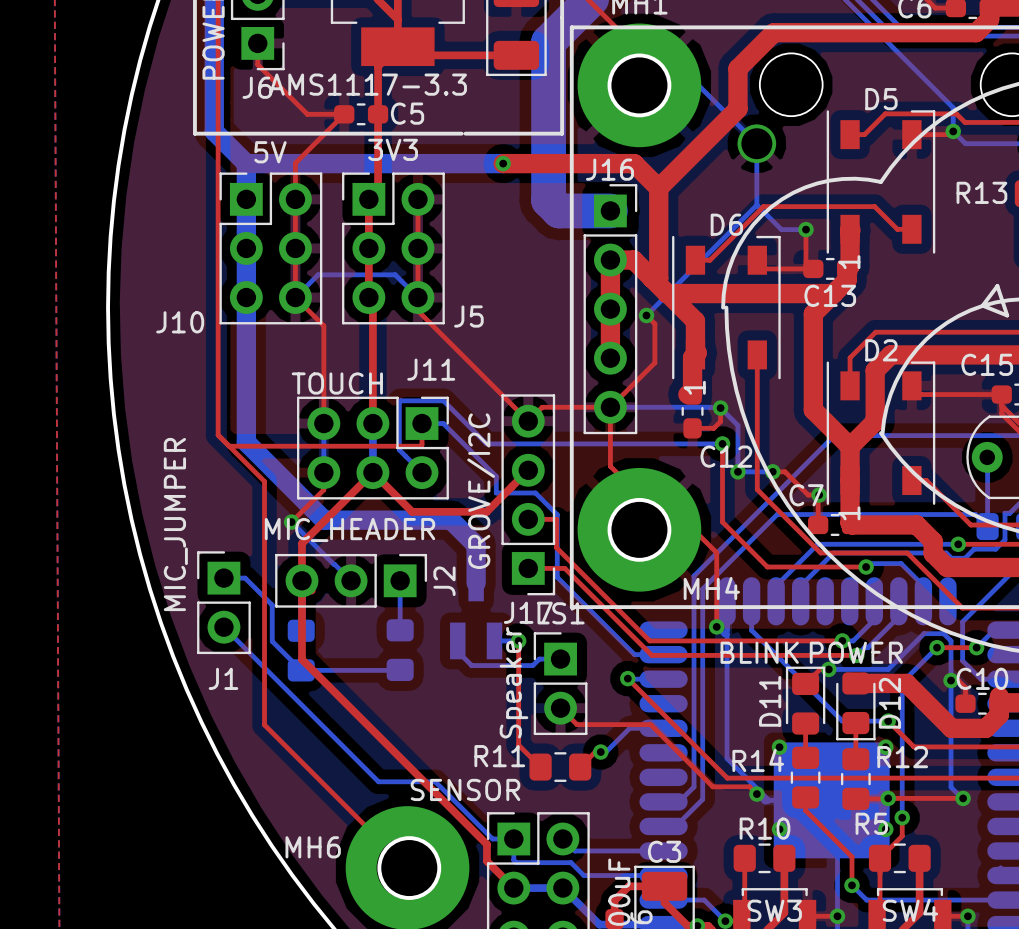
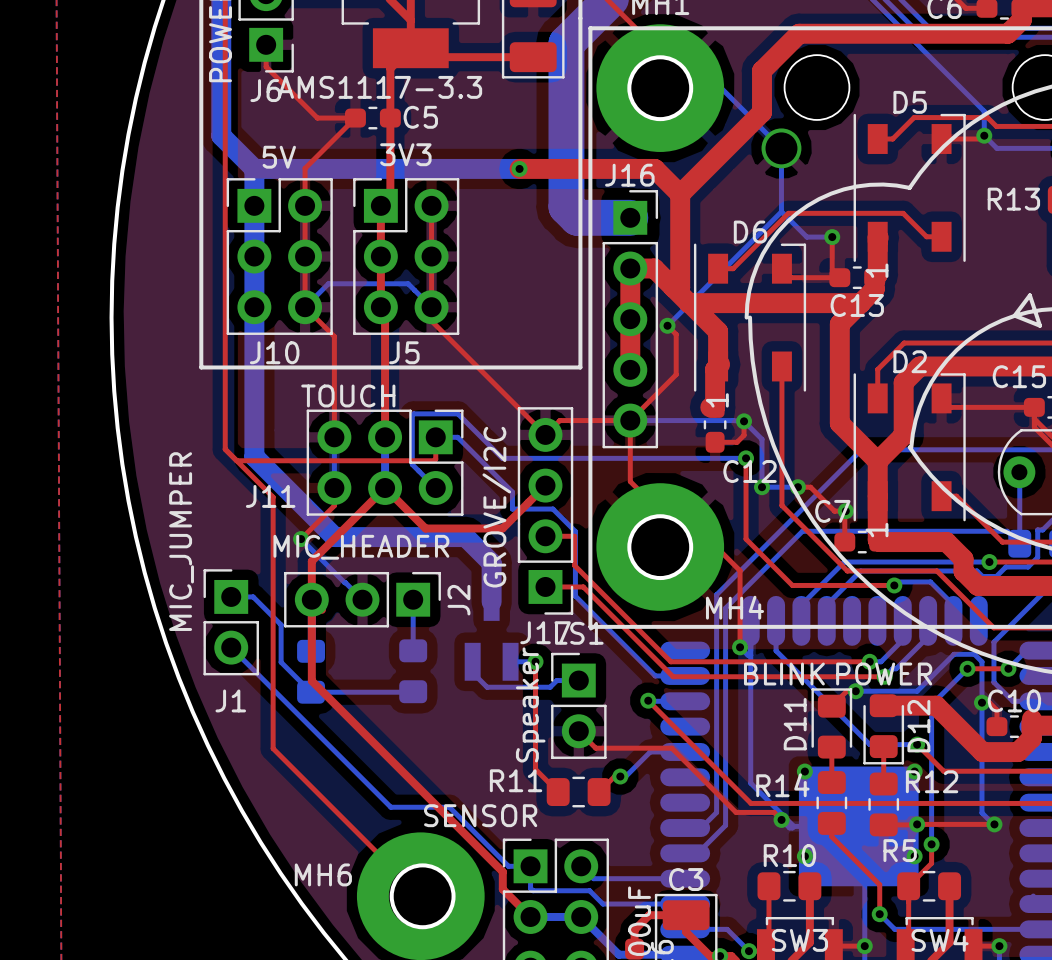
line: (194, 133) (461, 133) -> (201, 138) (201, 367) (580, 367) (580, 138)
line: (465, 133) (562, 133) -> none
J5 name position: J5 (468, 316) -> J5 (404, 352)
J10 name position: J10 (180, 322) -> J10 (274, 352)
J11 name position: J11 (431, 369) -> J11 (270, 496)

